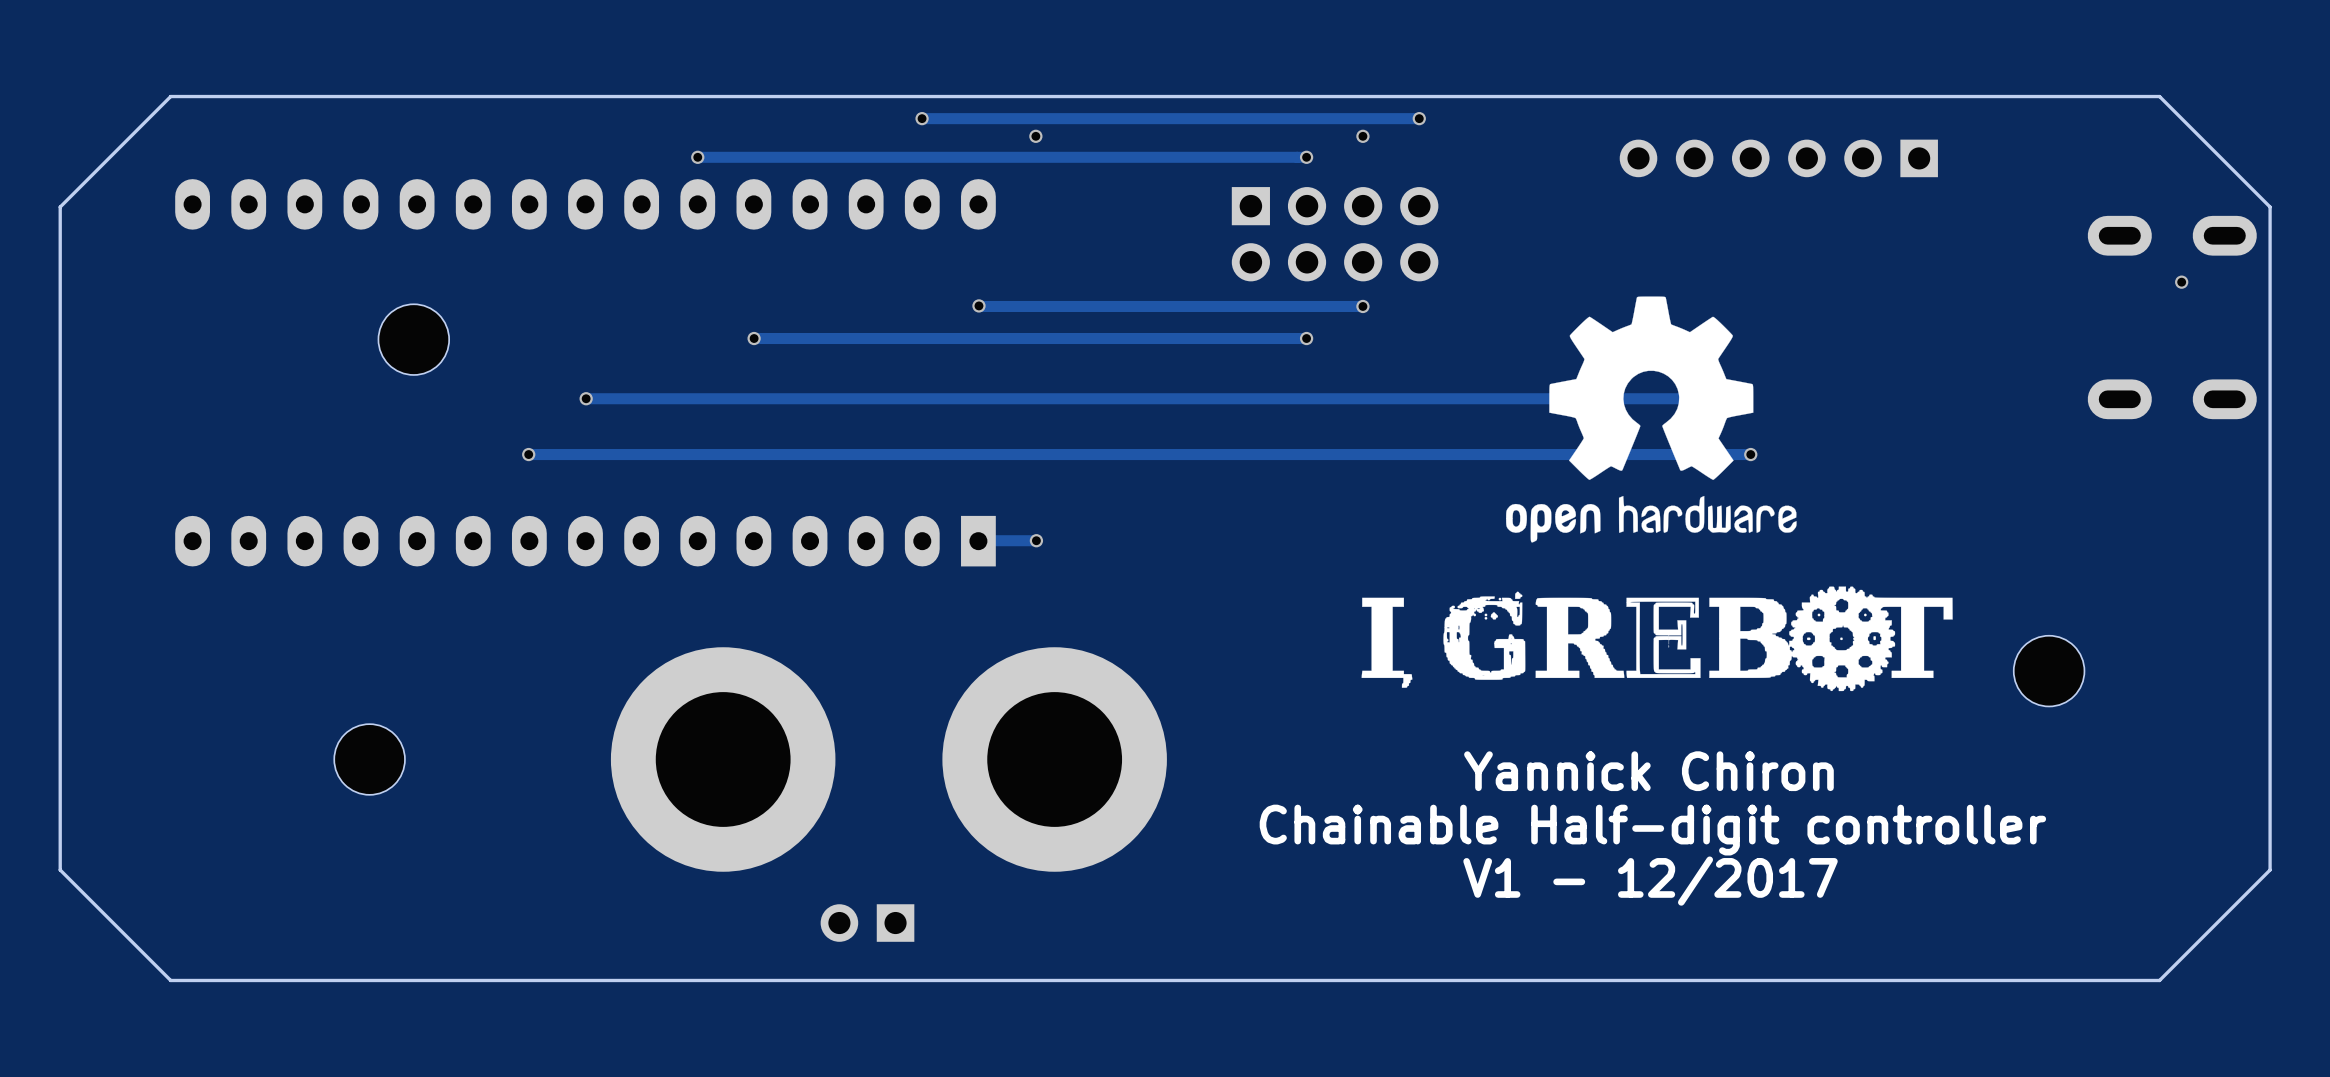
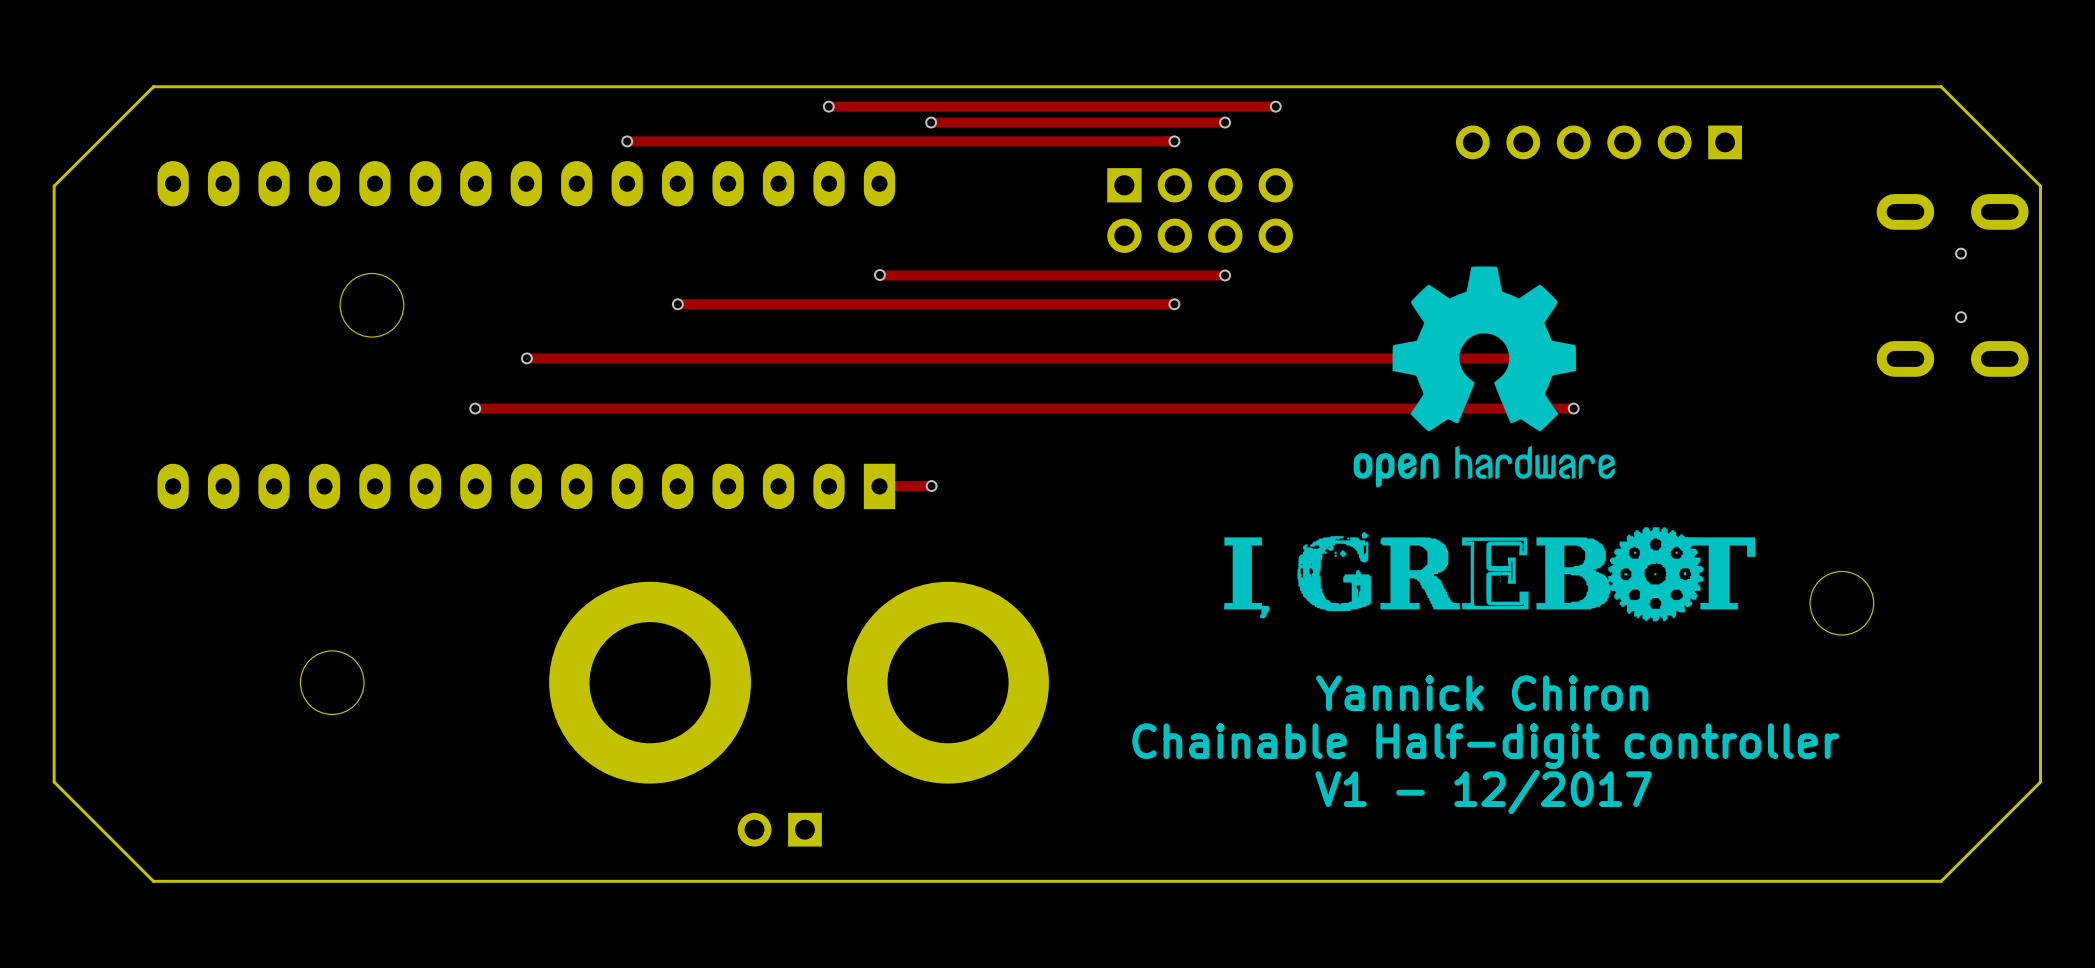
track: none -> (931, 122) (1225, 122)
via: none -> (1961, 317)

